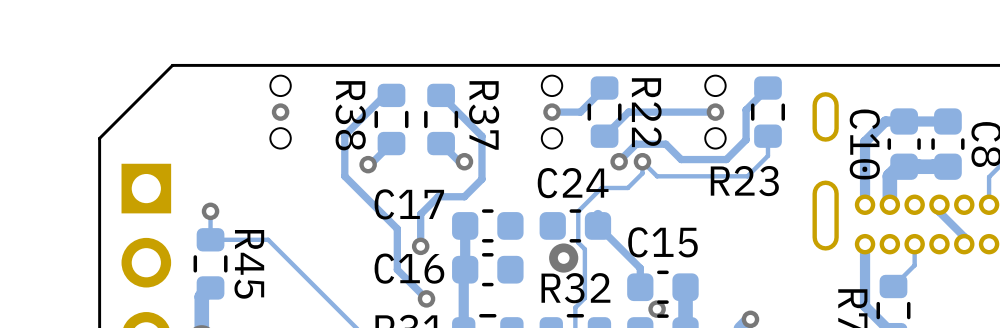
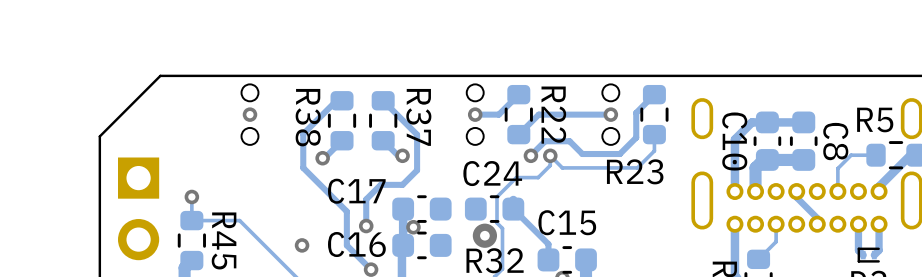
via: none -> (413, 227)
via: none -> (302, 245)

